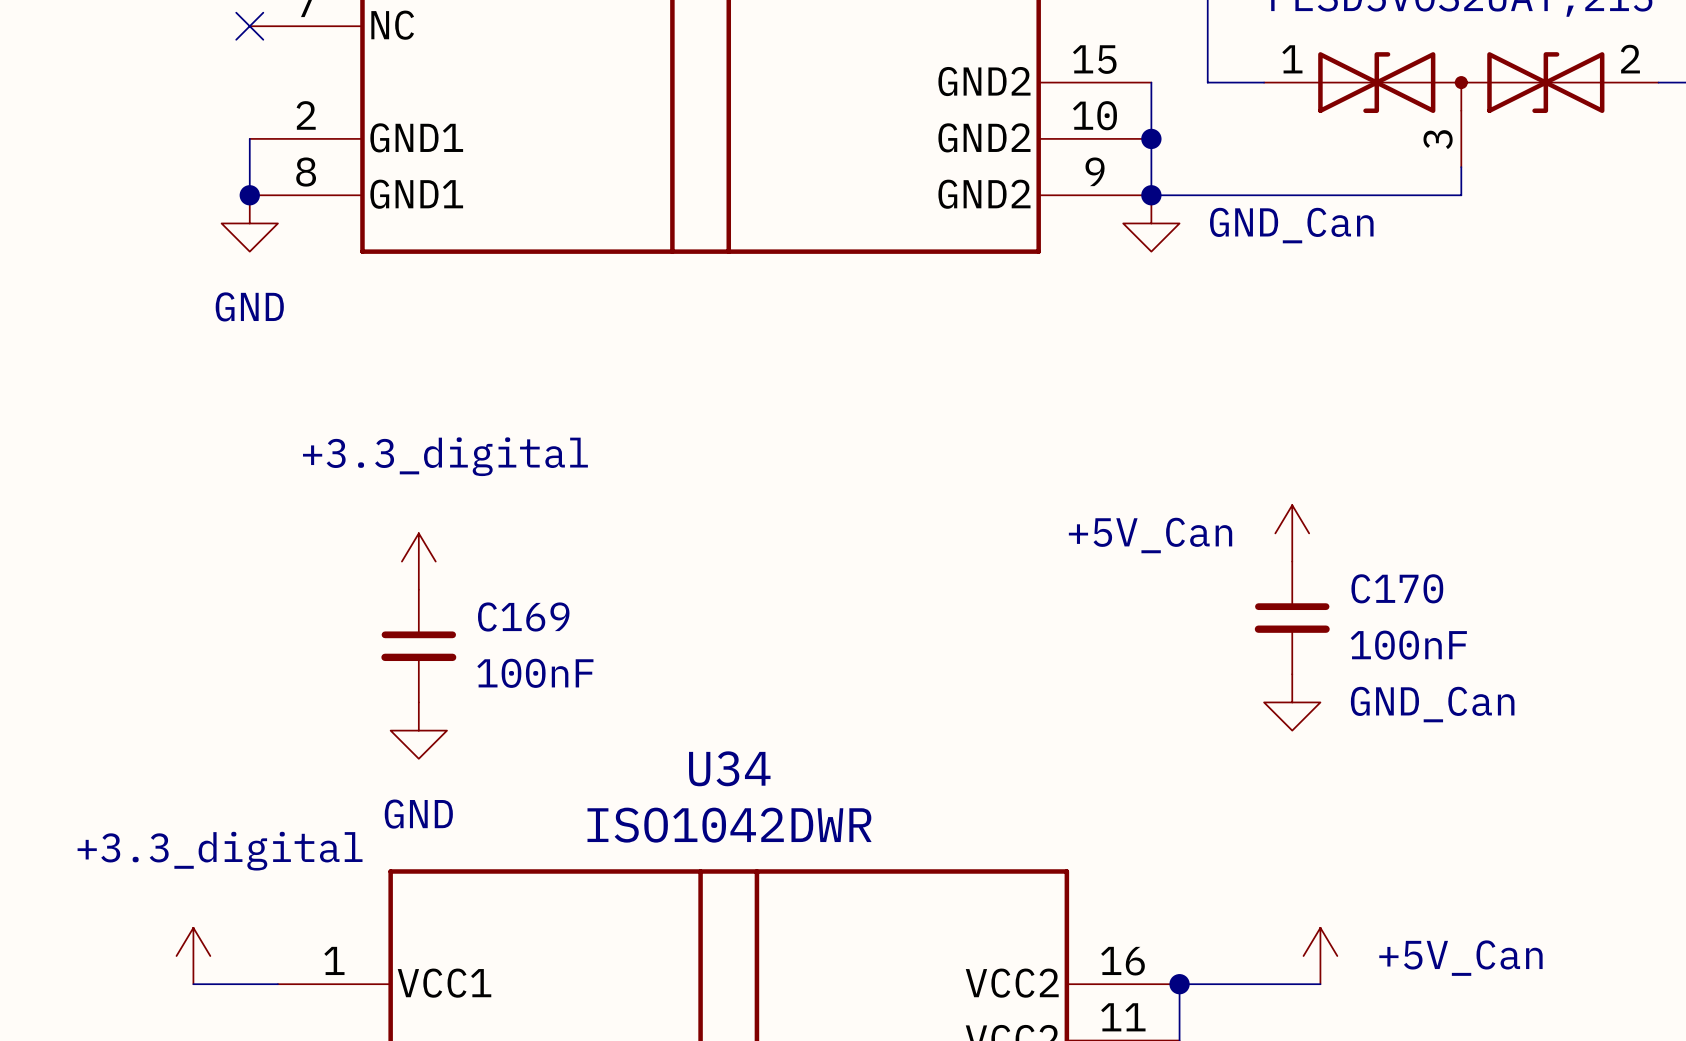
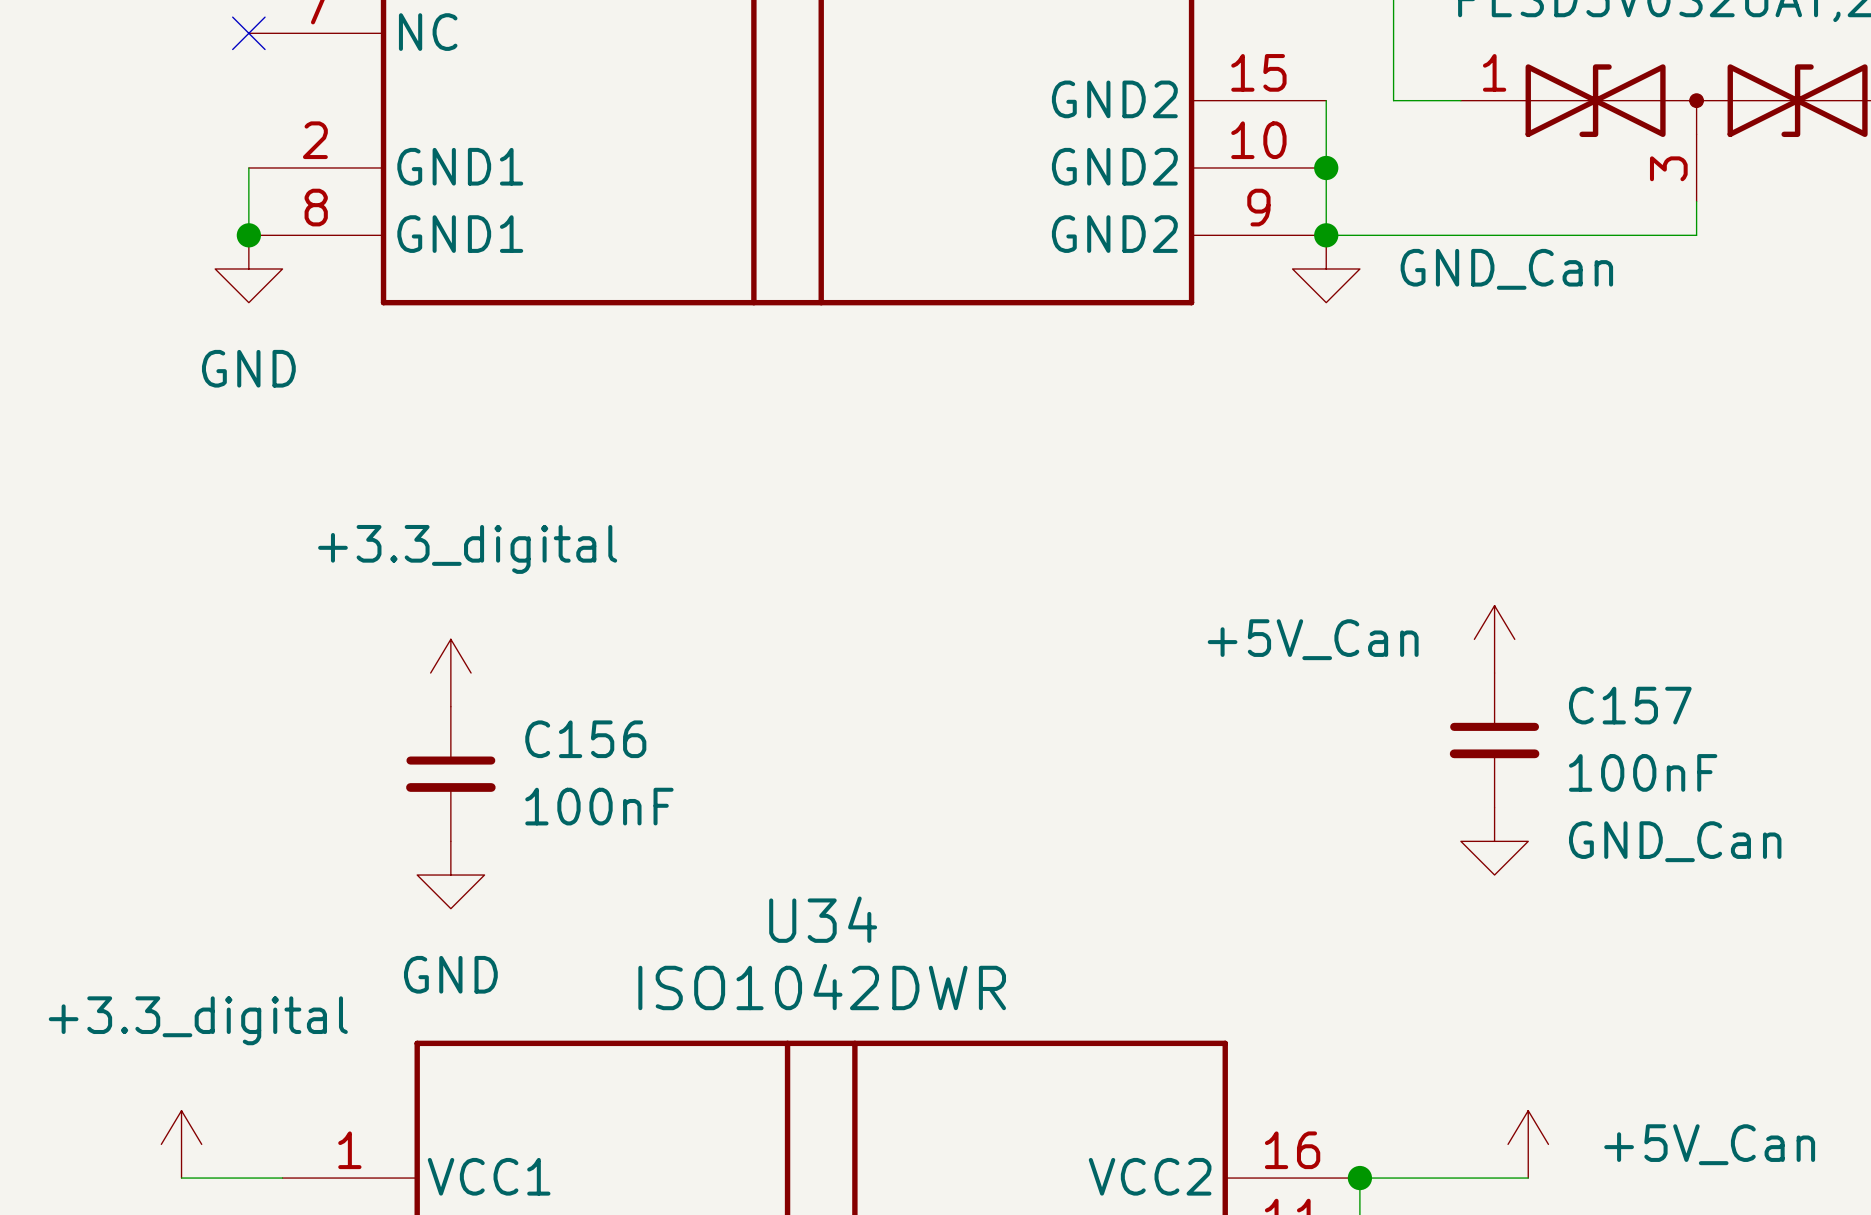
C170 name: C170 (1397, 588) -> C157 (1630, 705)
C169 name: C169 (523, 616) -> C156 (585, 739)

